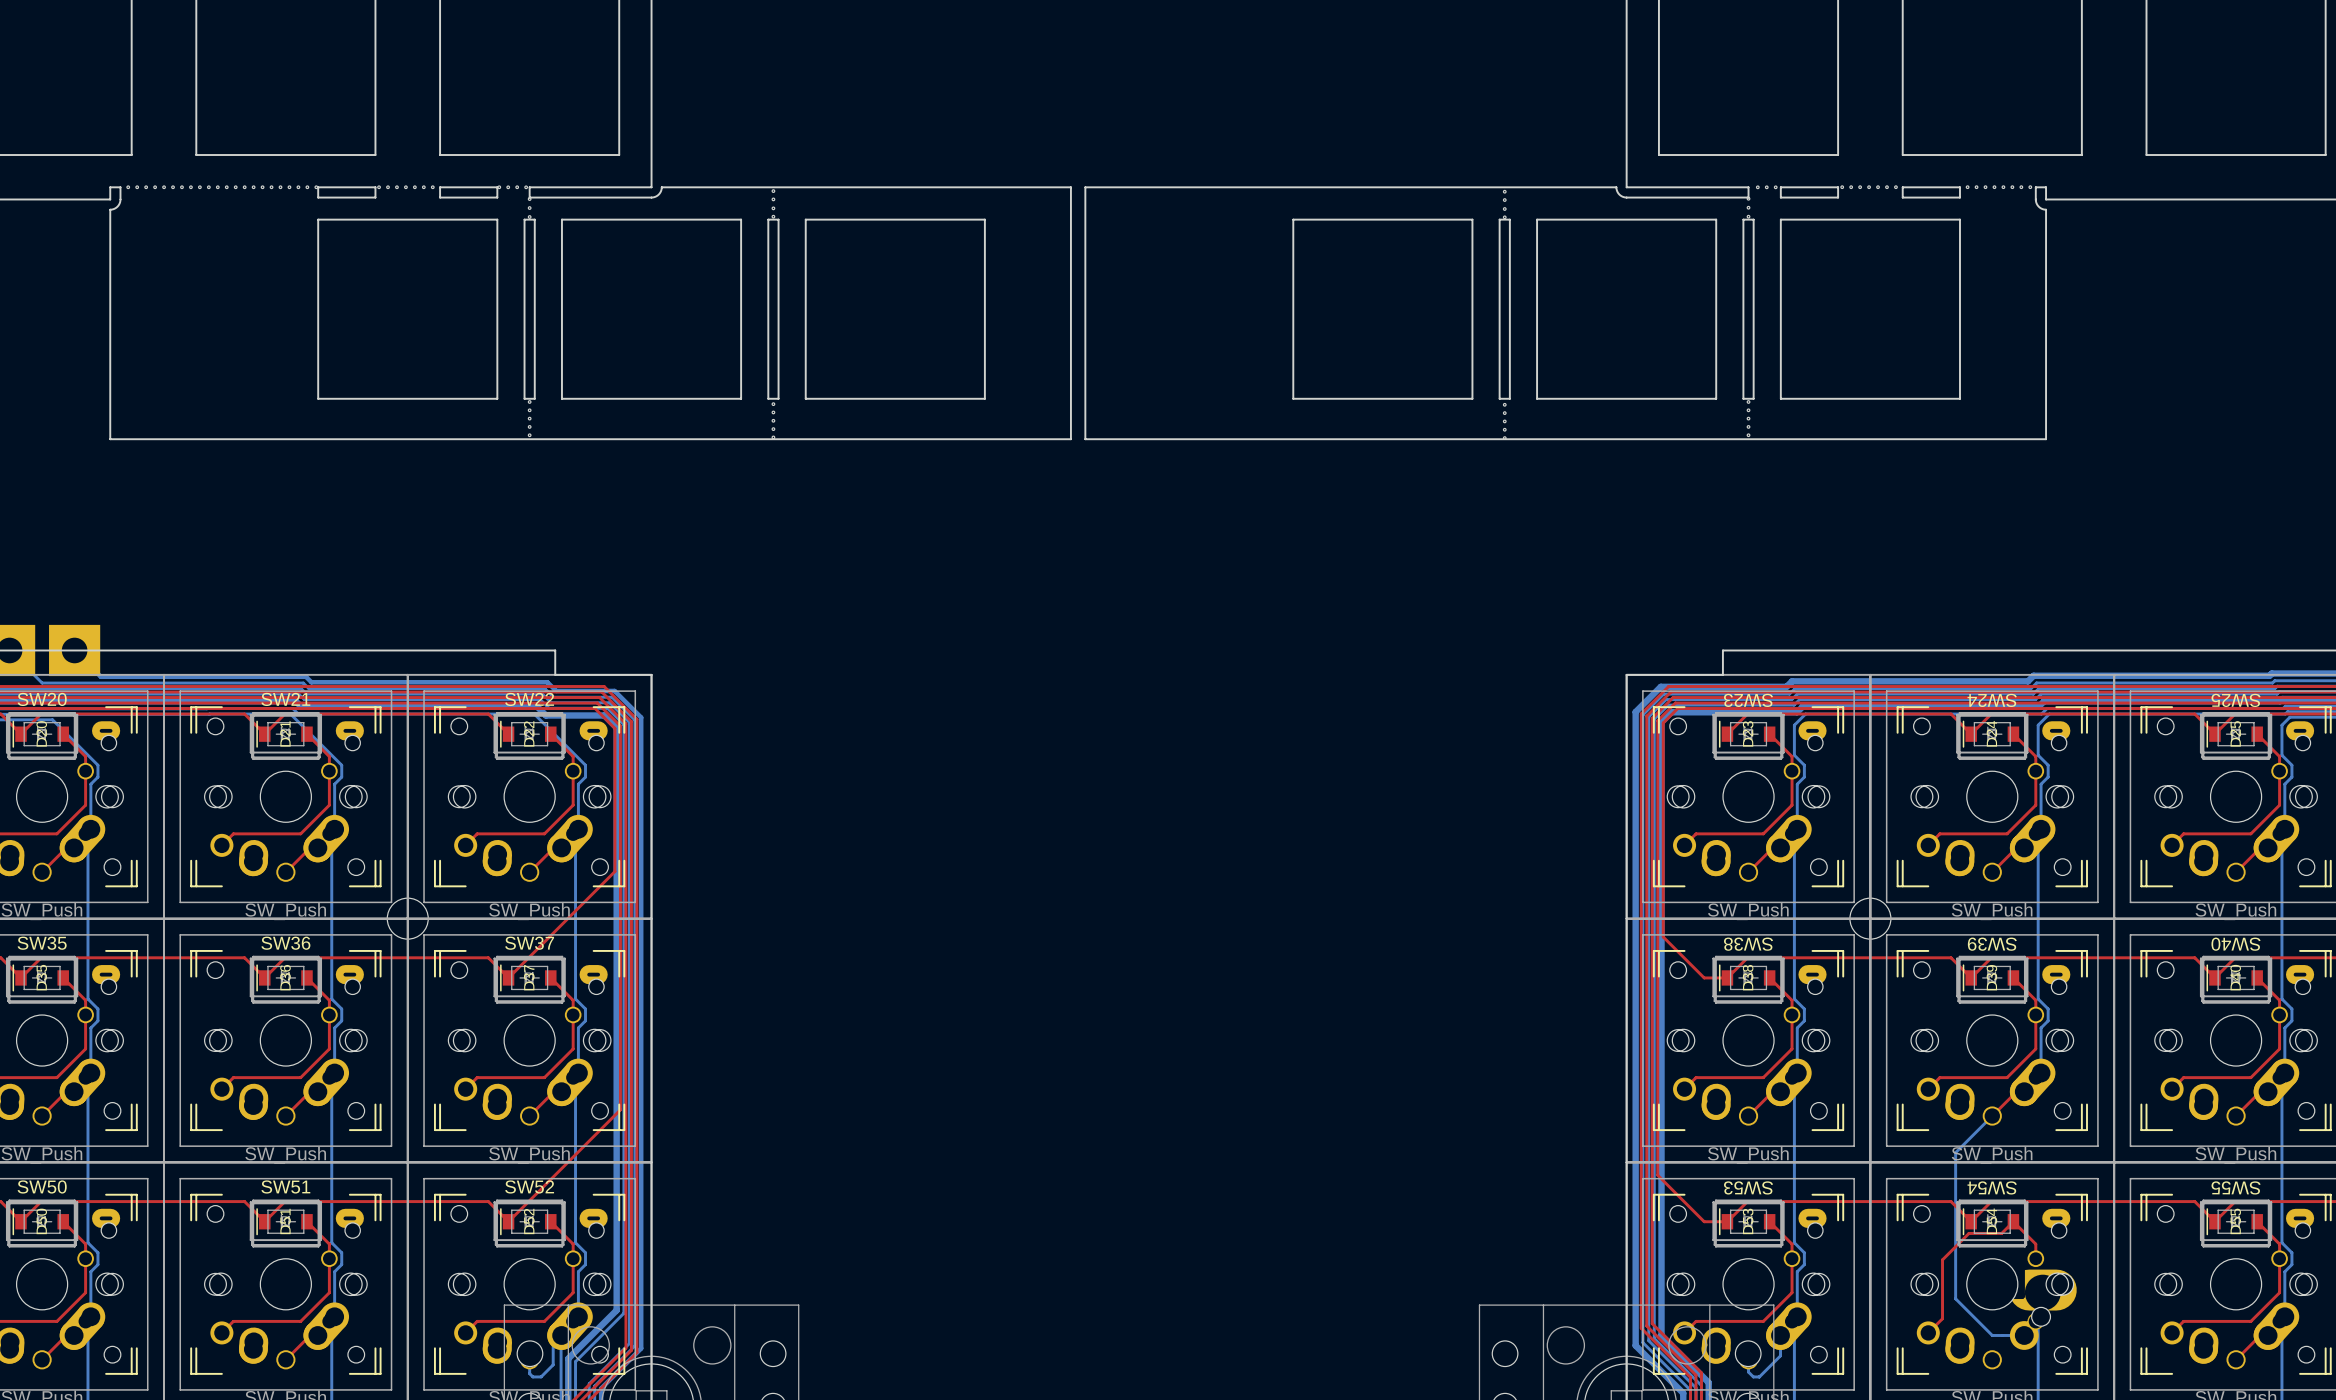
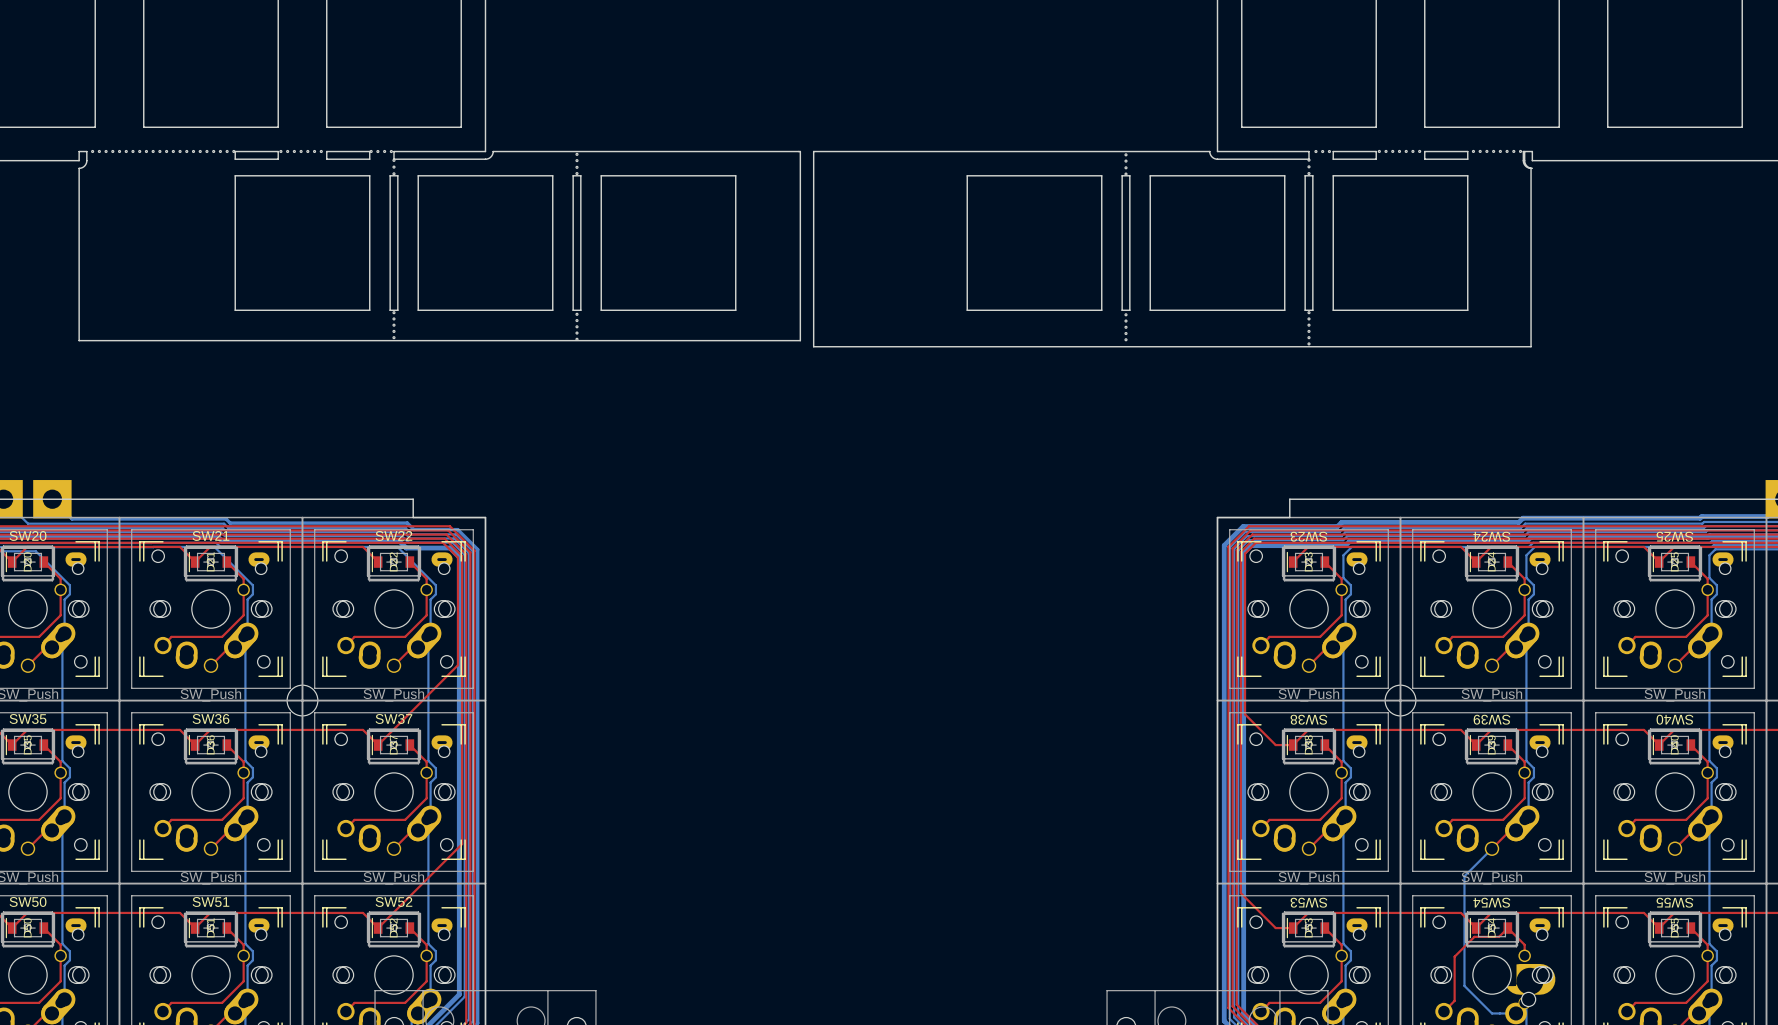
board edge: (1088, 187) (1085, 187) (1085, 439) (2046, 439) (2046, 209) -> (813, 151) (813, 346) (1531, 346) (1531, 168) (1523, 163) (1524, 151)
part: none -> (1308, 343)

